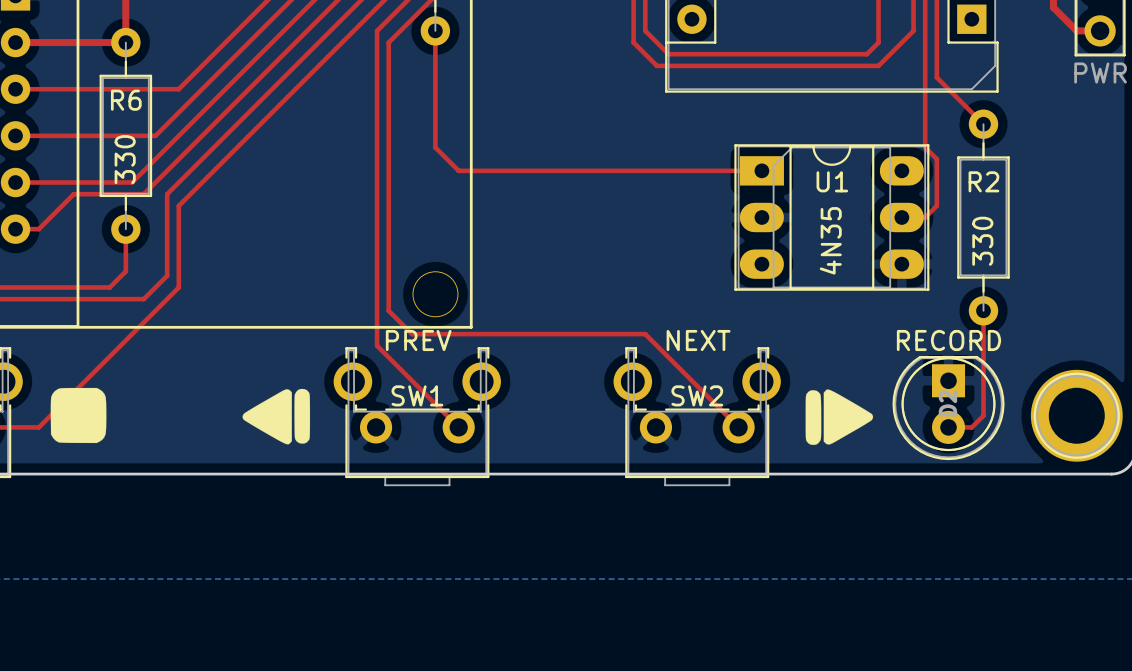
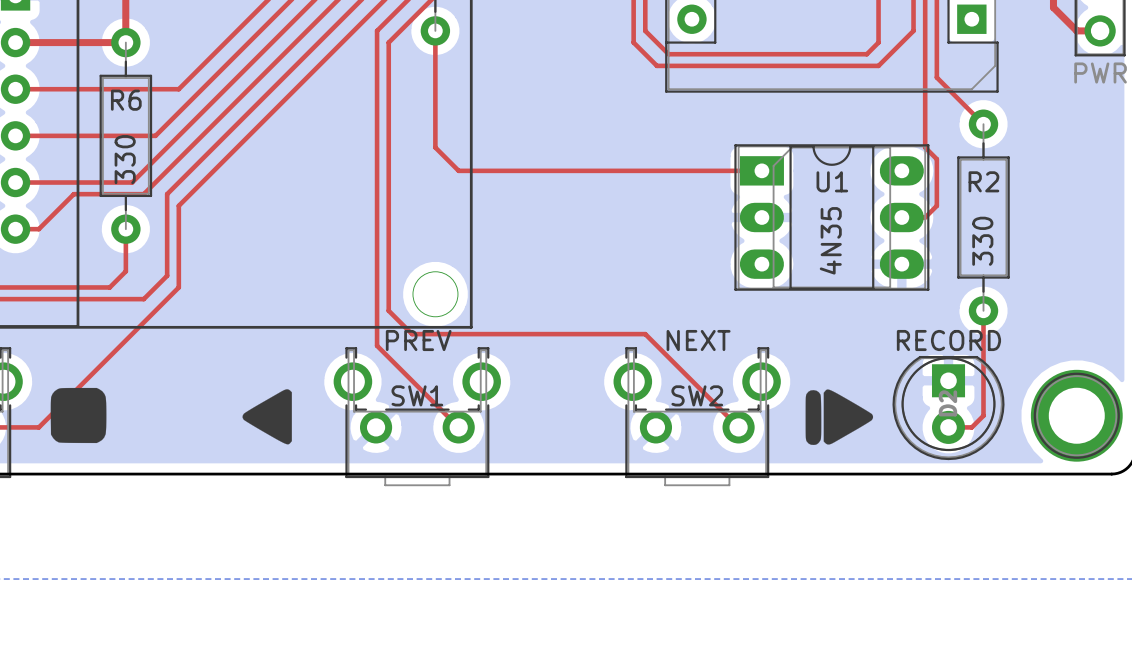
drawing shape: [242, 388, 311, 445] -> [242, 389, 292, 445]

